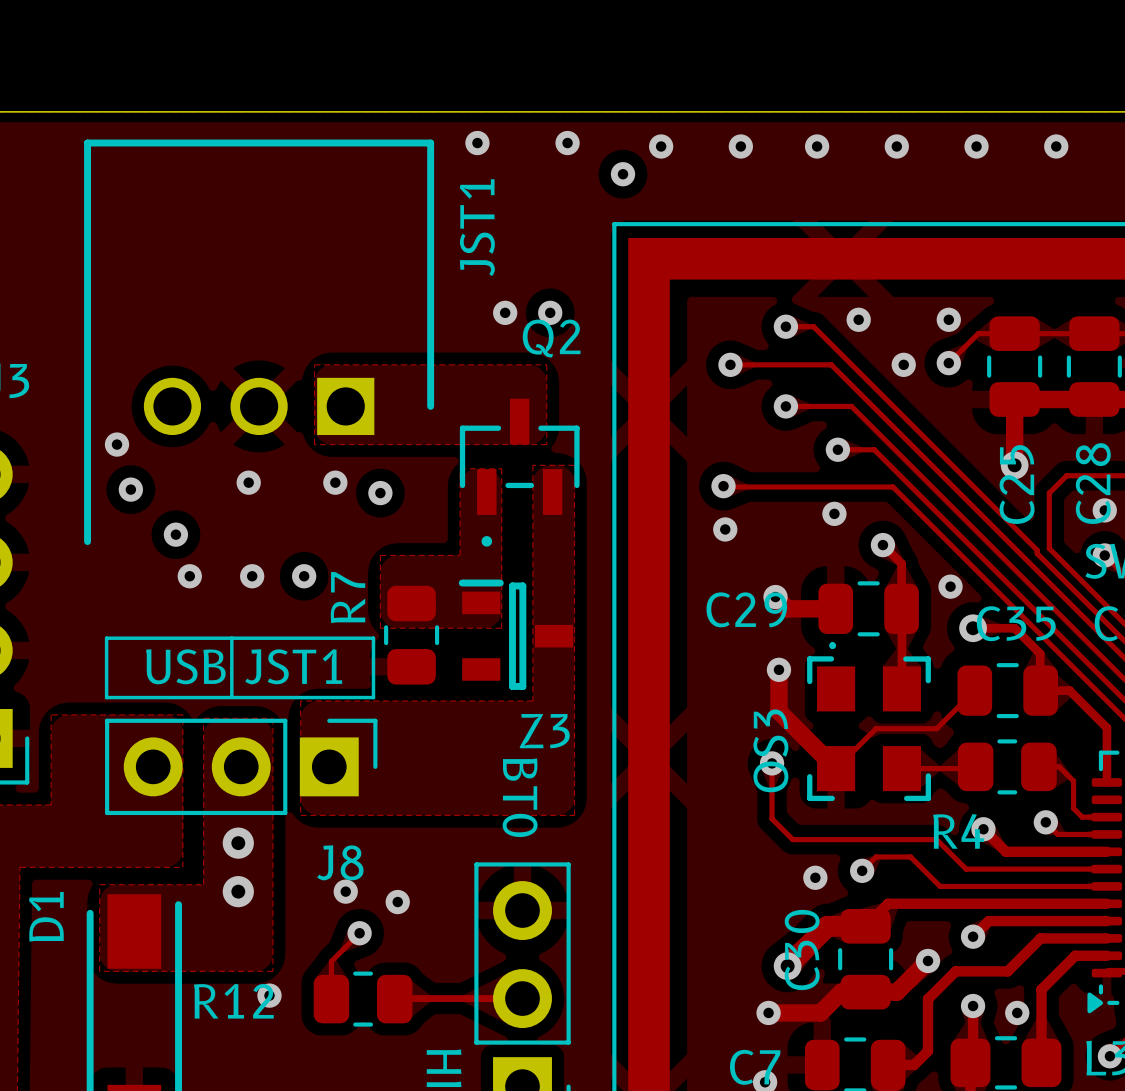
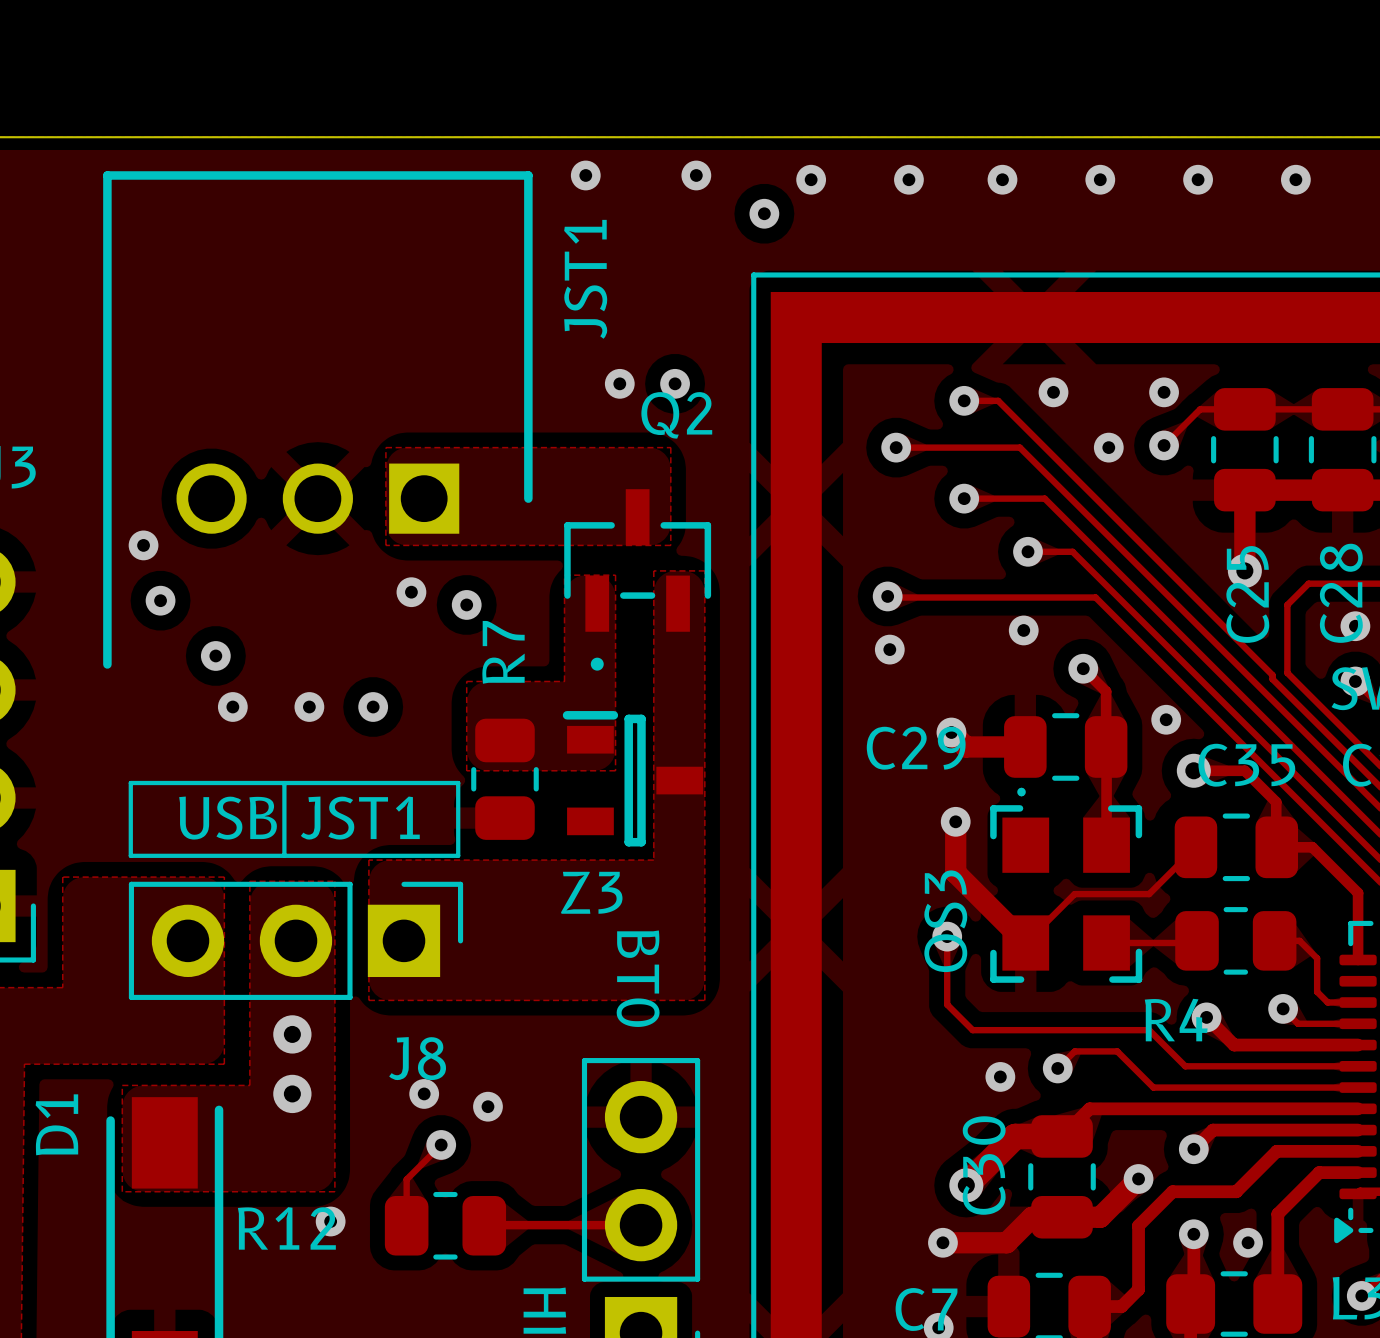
via: (248, 482) -> none
R7 name position: R7 (348, 597) -> R7 (503, 652)
Z3 name position: Z3 (544, 731) -> Z3 (591, 892)

